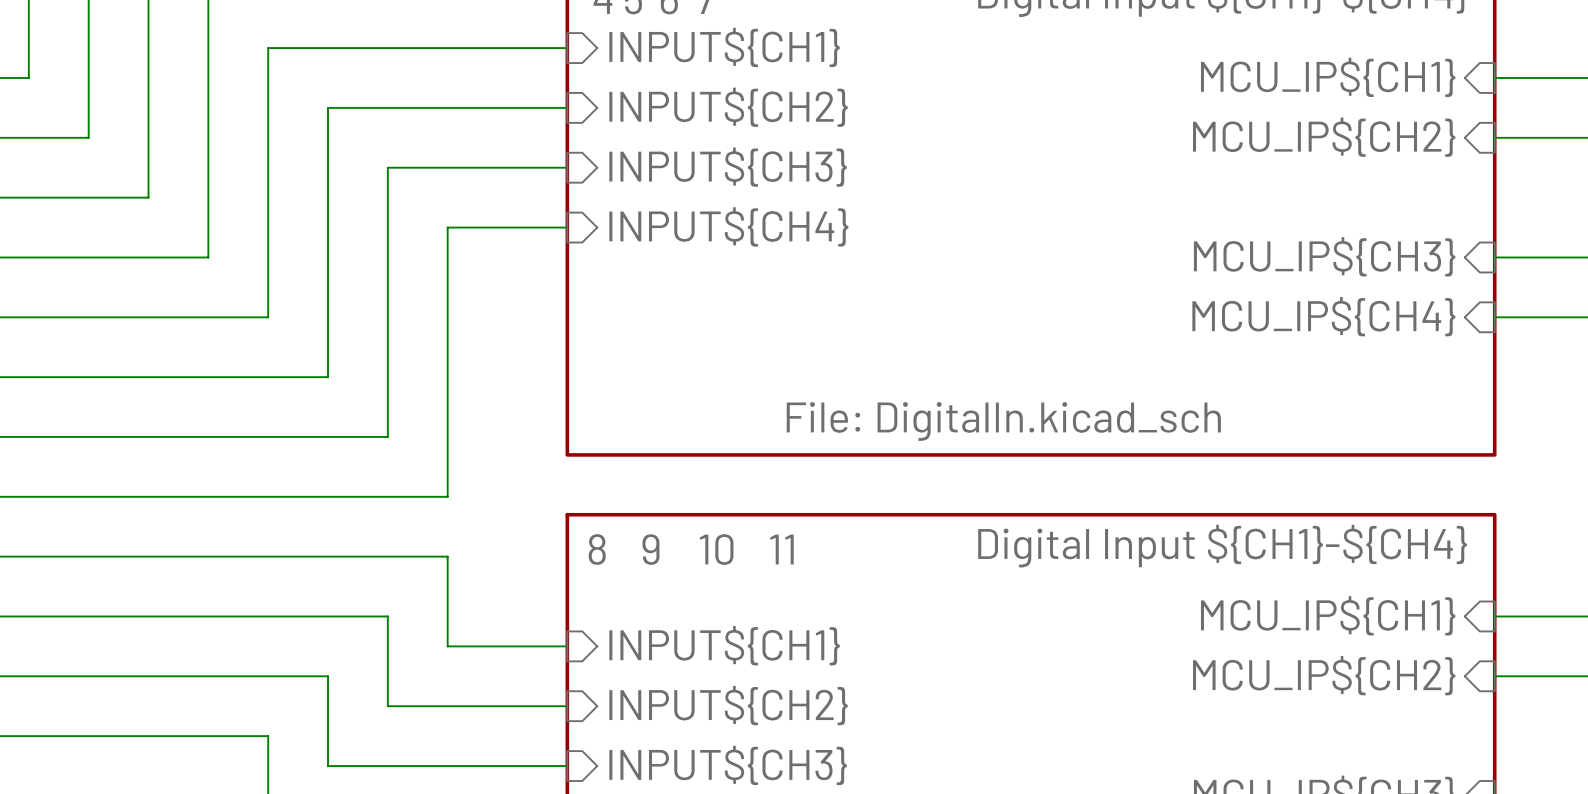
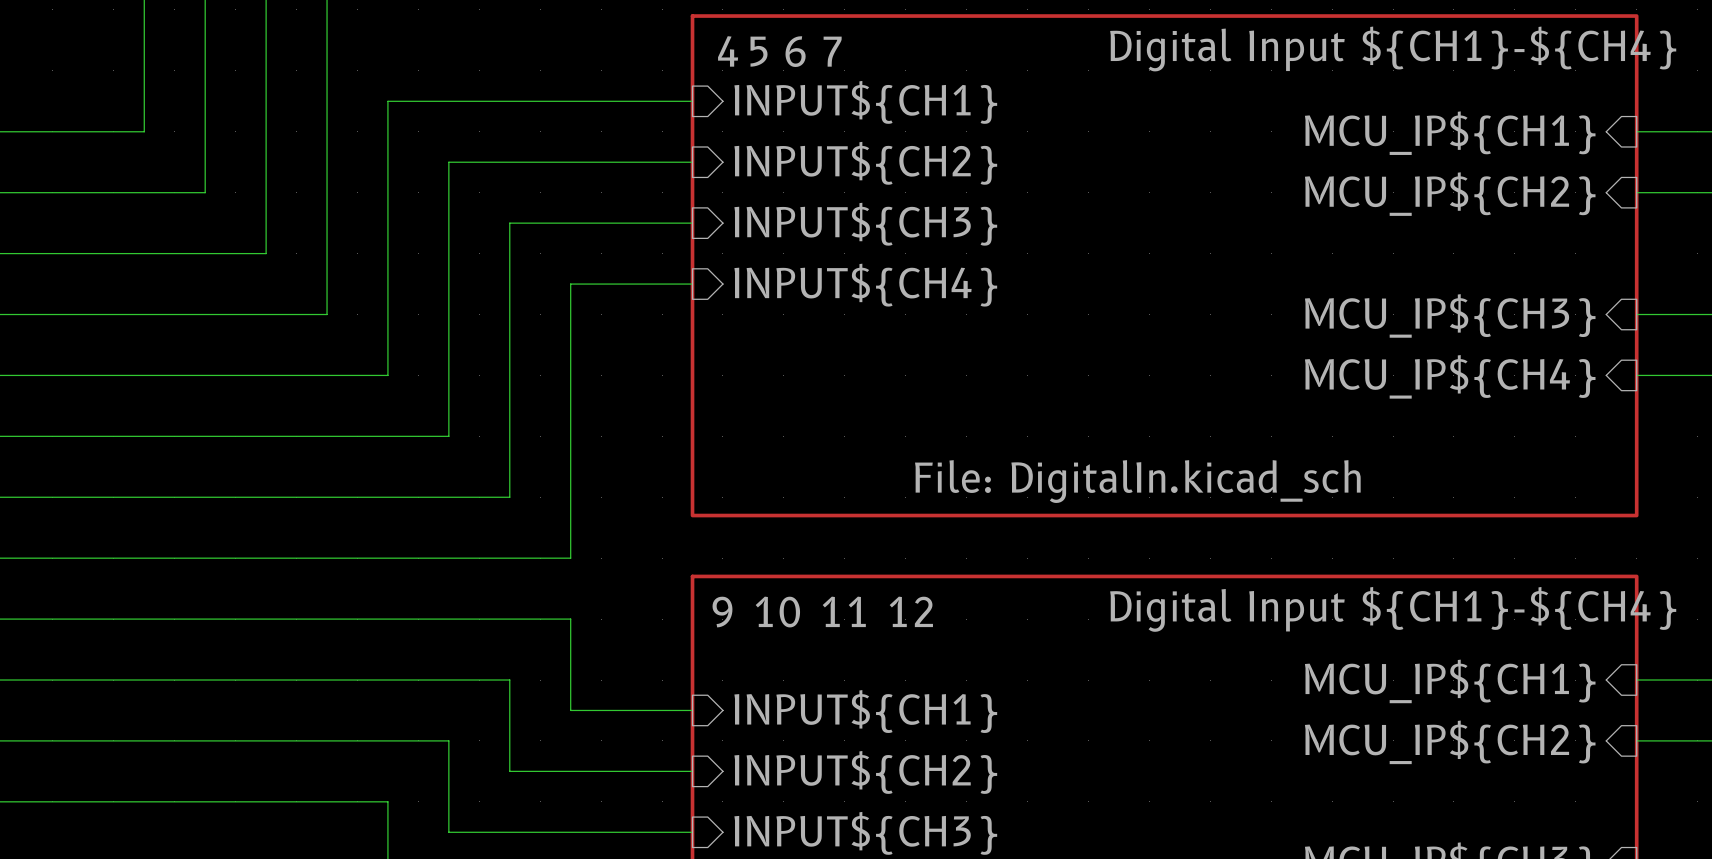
sheet Digital Input ${CH1}-${CH4} text: 8 (597, 549) -> 9 (722, 612)
sheet Digital Input ${CH1}-${CH4} text: 9 (650, 549) -> 10 (777, 612)
sheet Digital Input ${CH1}-${CH4} text: 10 (716, 549) -> 11 (844, 611)
sheet Digital Input ${CH1}-${CH4} text: 11 (781, 549) -> 12 (911, 611)

